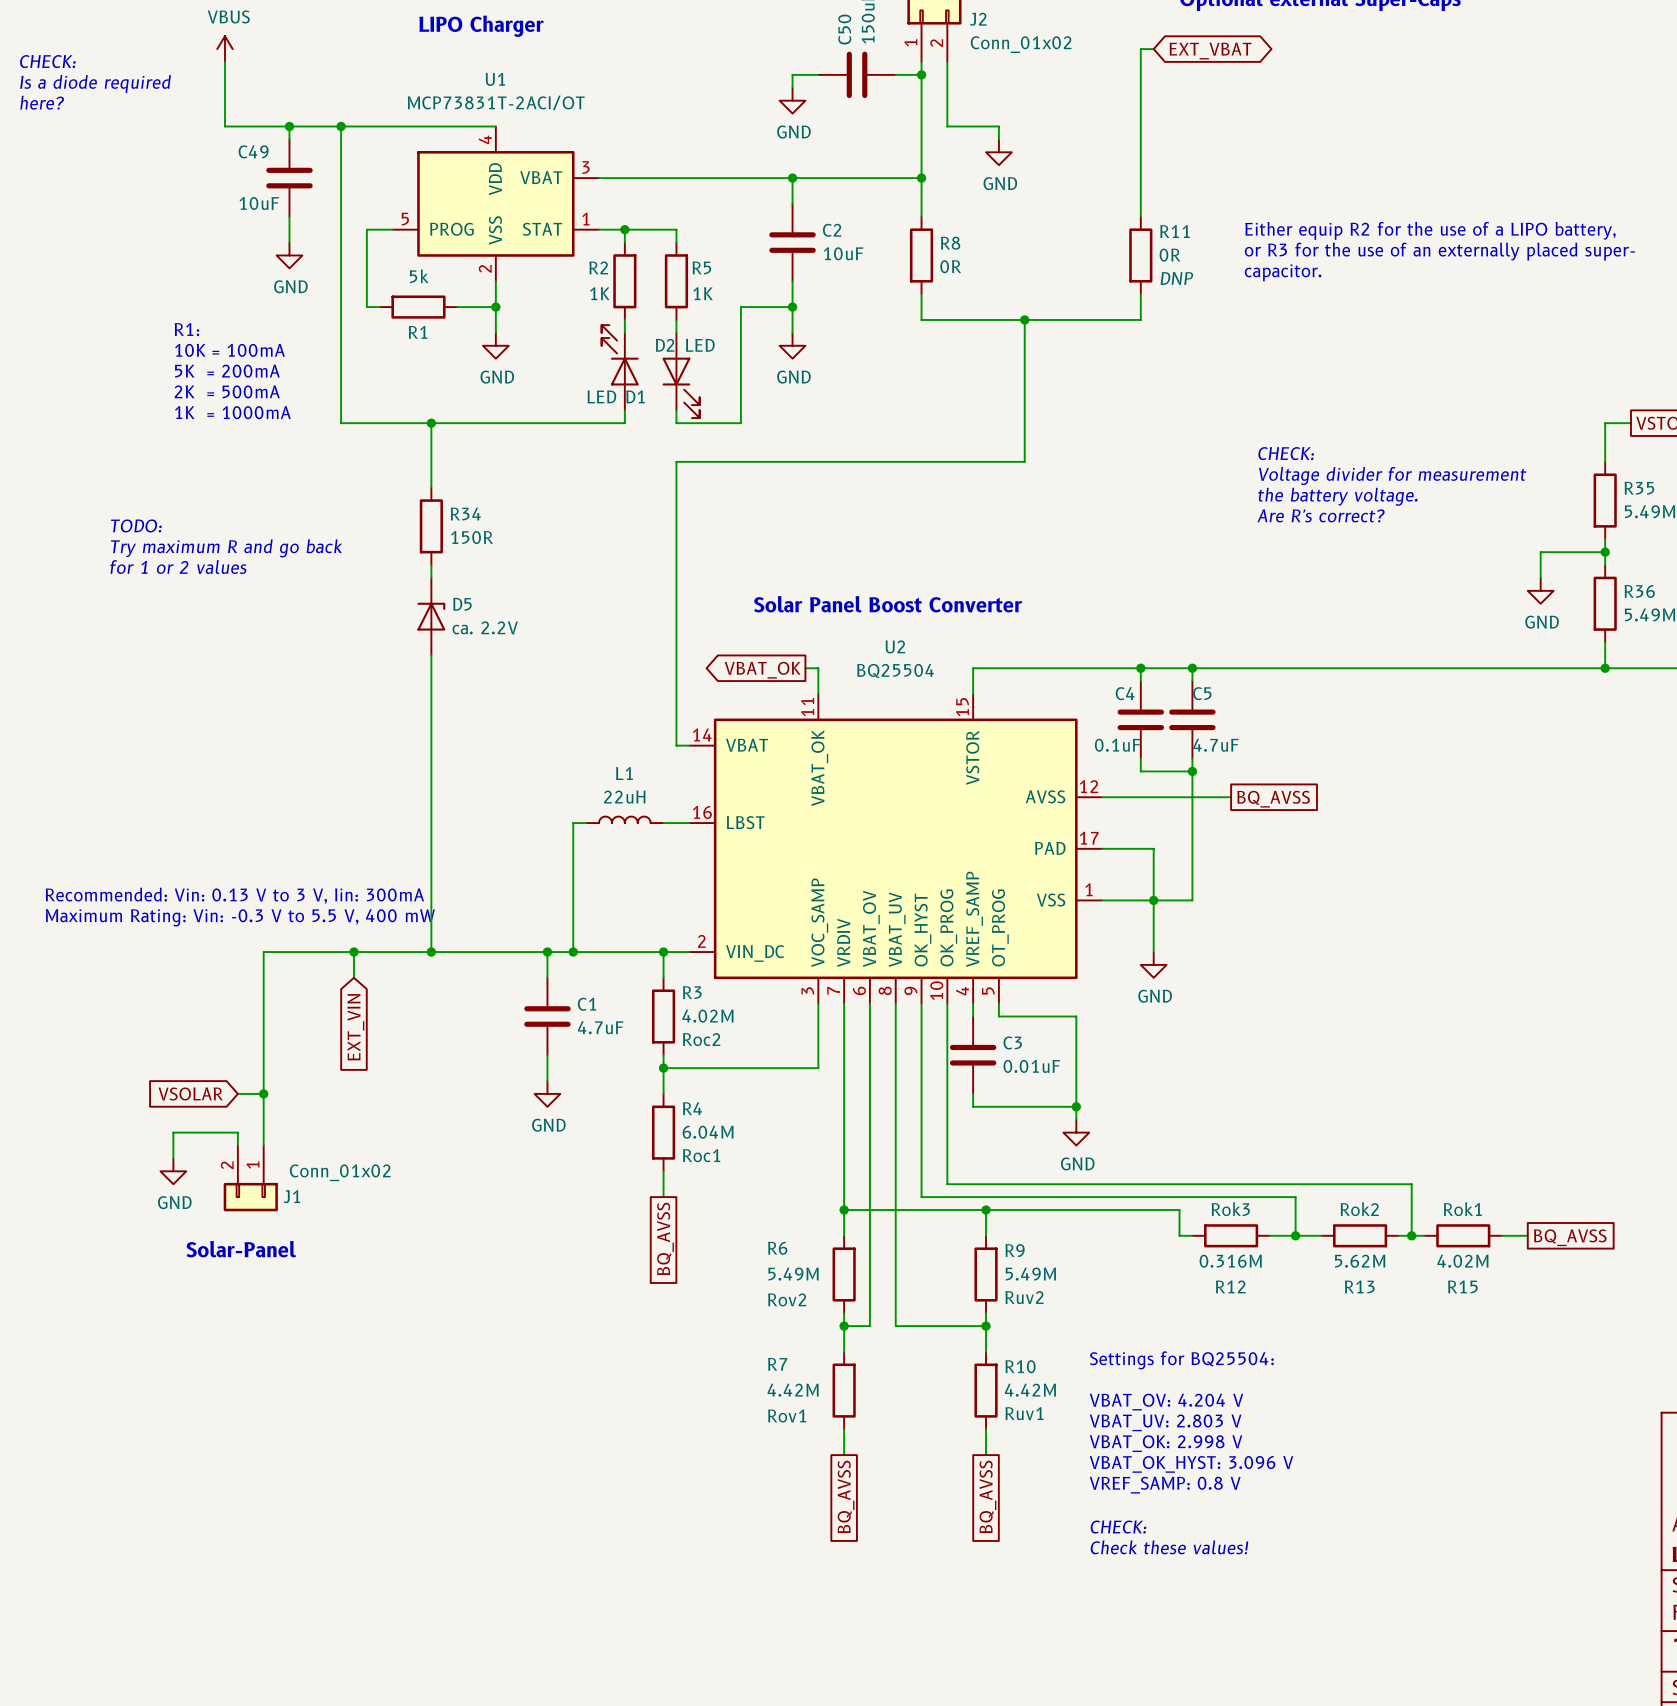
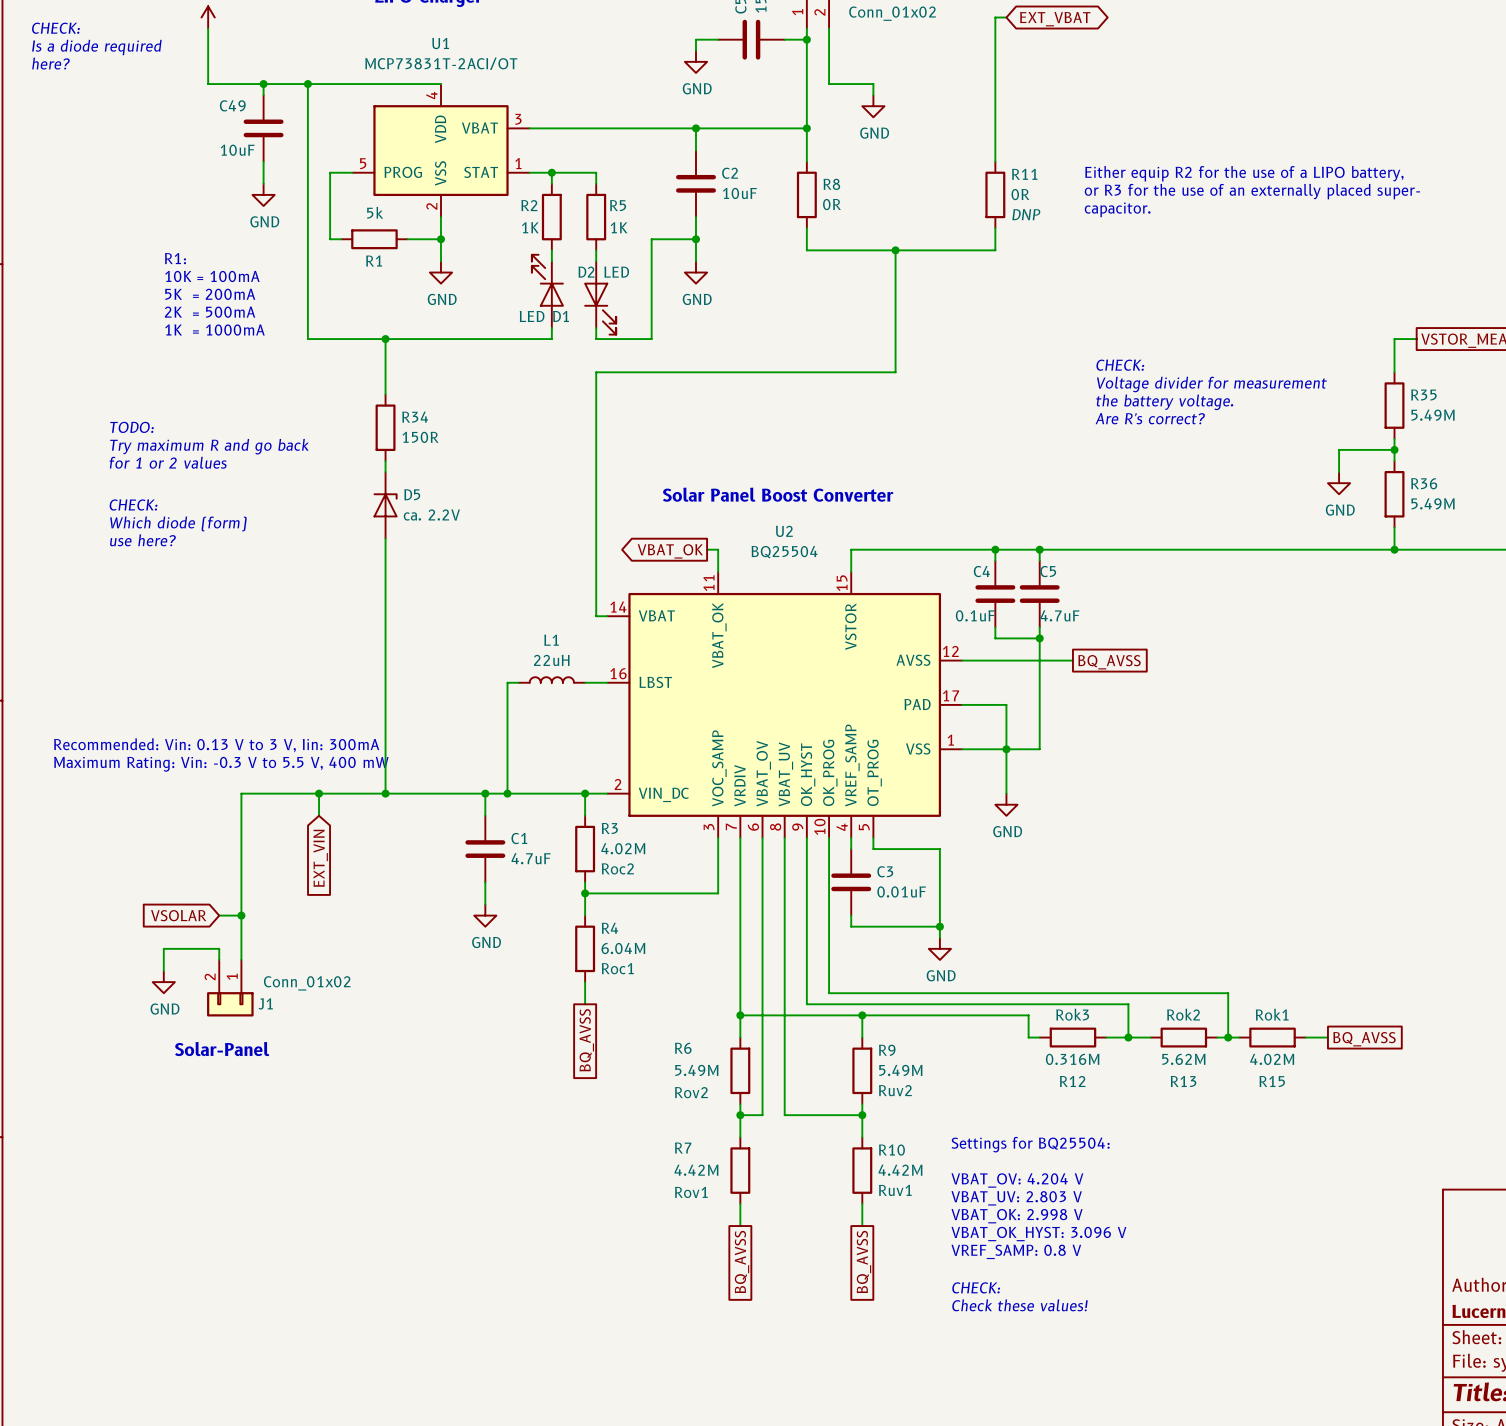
text: none -> CHECK: (133, 504)
text: none -> Which diode (form) (178, 523)
text: none -> use here? (142, 540)

